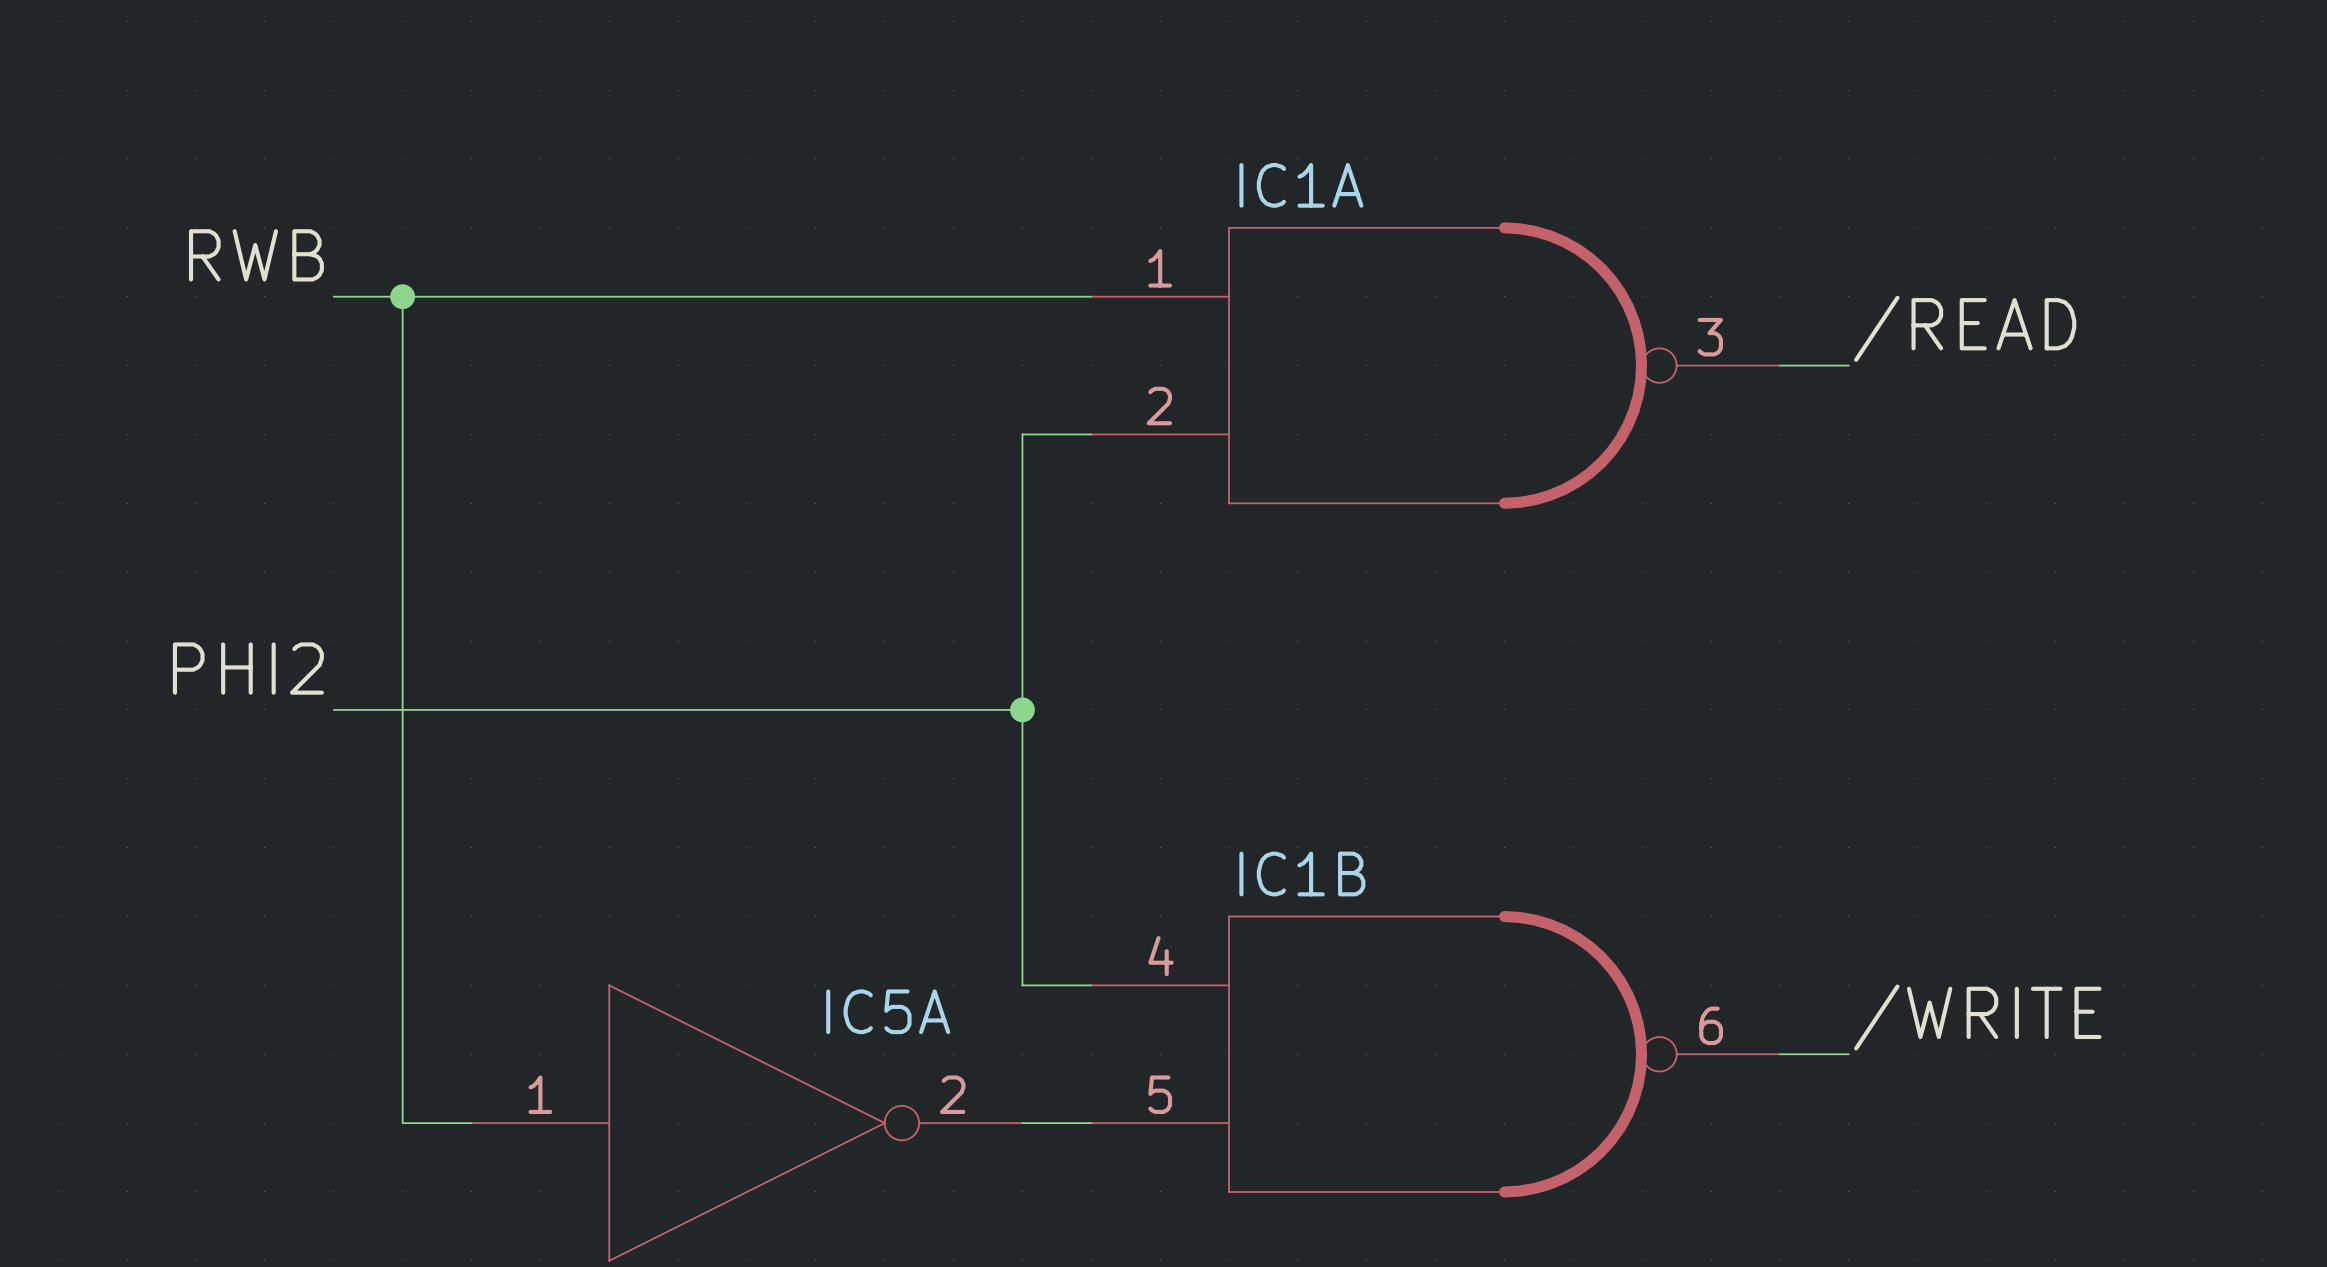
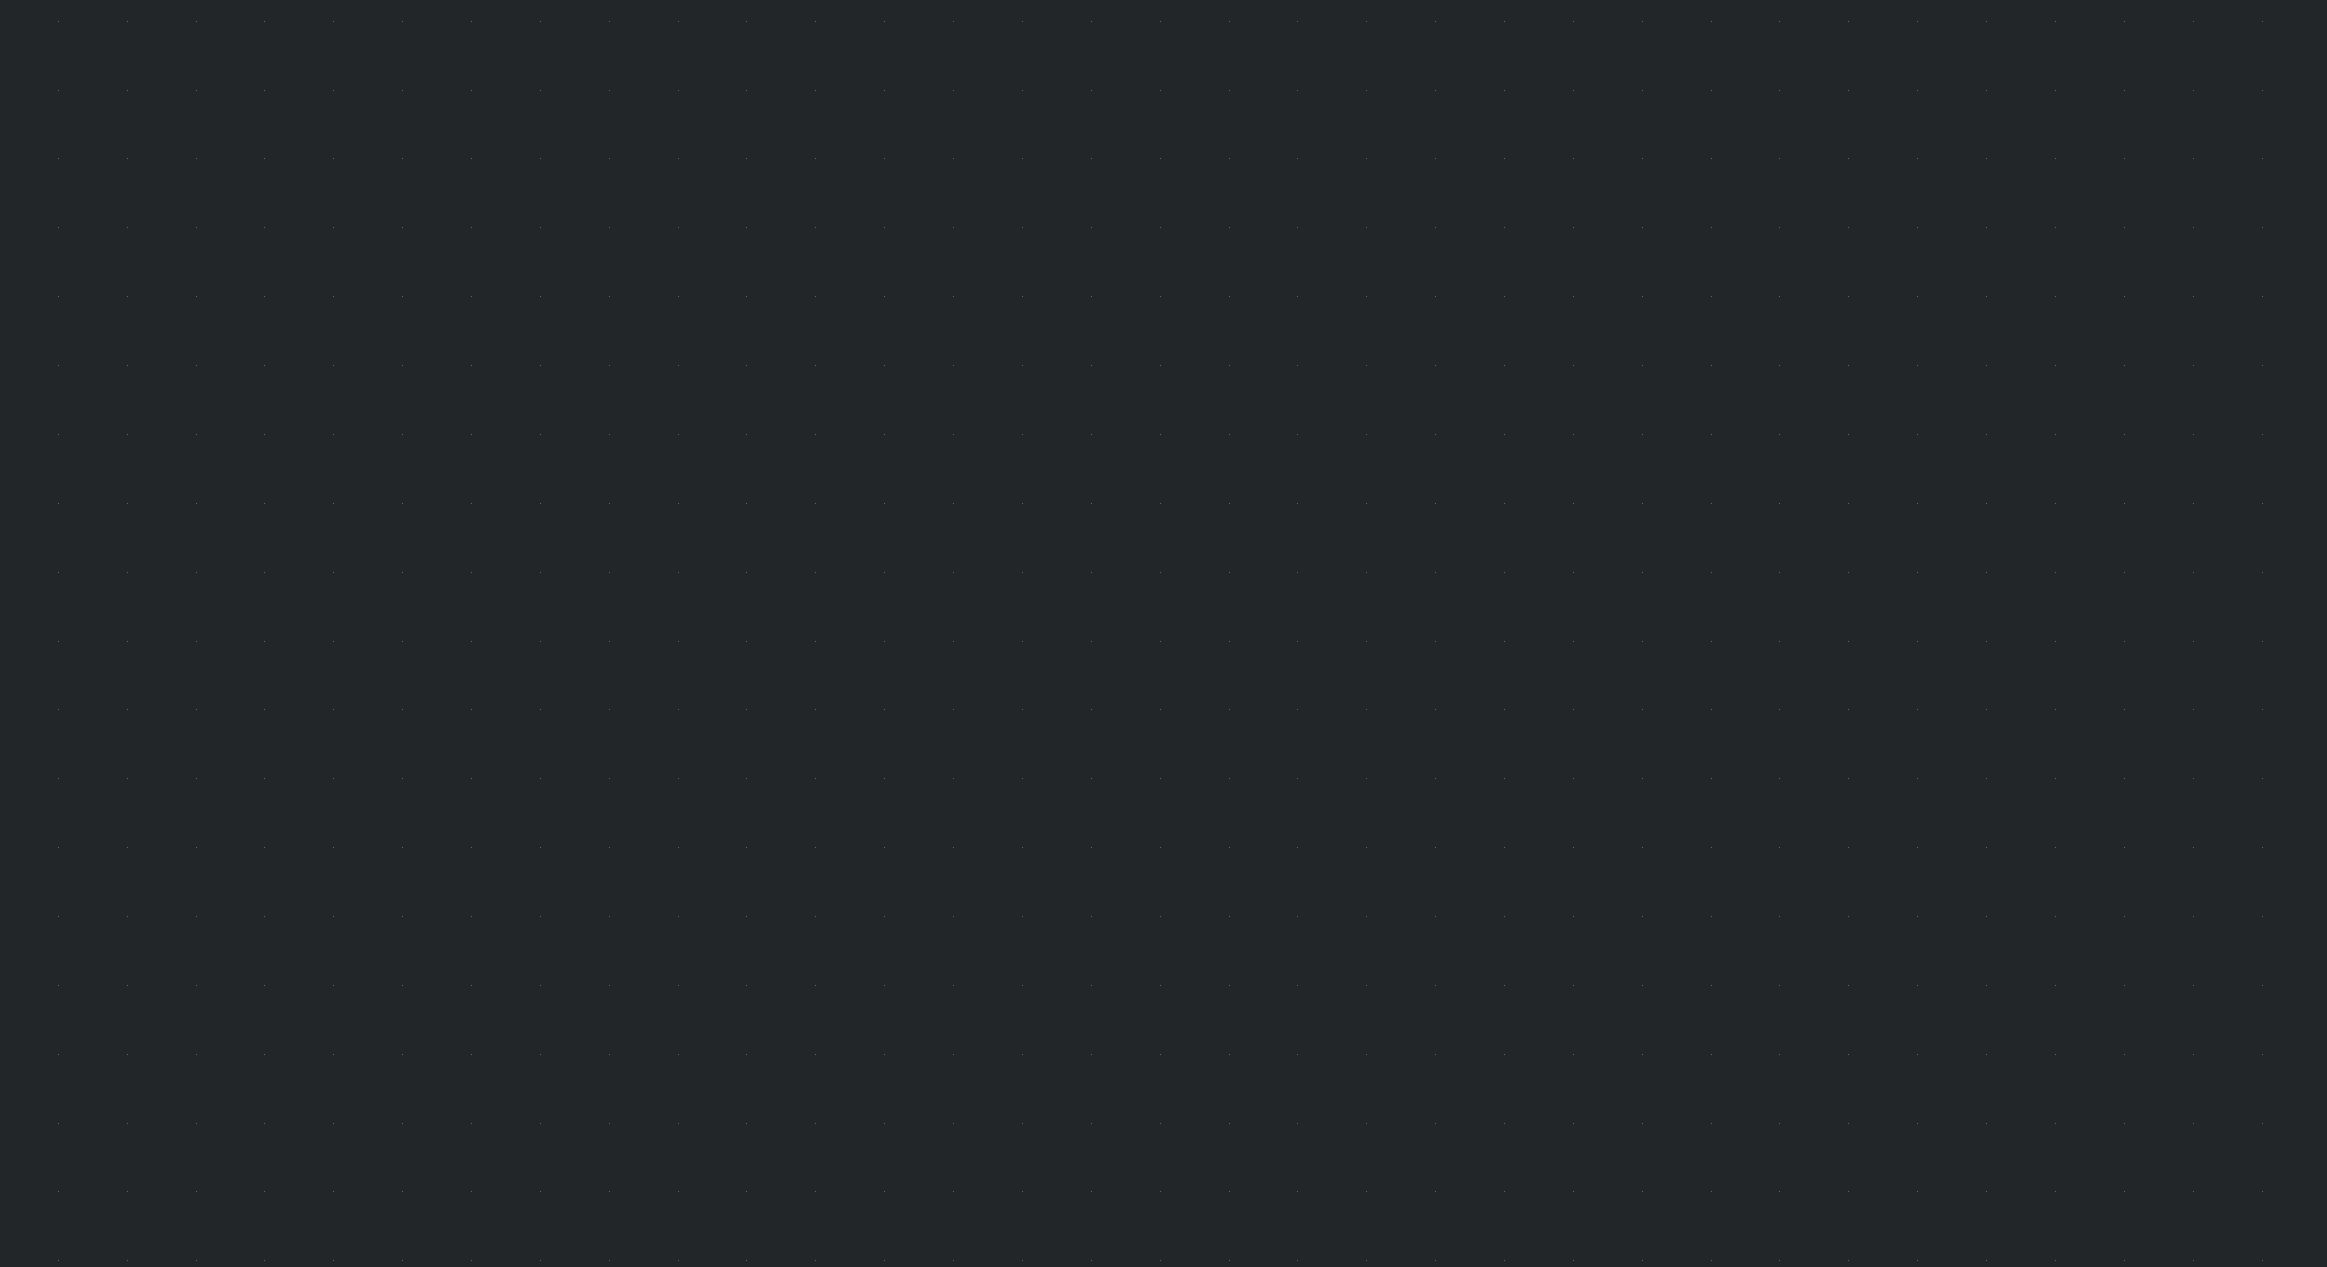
label: RWB (256, 255) -> none
wire: (333, 296) (1091, 296) -> none
wire: (402, 296) (402, 1123) (471, 1123) -> none
junction: (402, 296) -> none
label: /READ (1965, 328) -> none
IC1A: (1435, 365) -> none
wire: (1779, 365) (1848, 365) -> none
wire: (1091, 434) (1022, 434) (1022, 985) (1091, 985) -> none
label: PHI2 (248, 668) -> none
wire: (333, 709) (1022, 709) -> none
junction: (1022, 709) -> none
label: /WRITE (1977, 1017) -> none
IC1B: (1435, 1054) -> none
wire: (1779, 1054) (1848, 1054) -> none
IC5A: (746, 1123) -> none
wire: (1022, 1123) (1091, 1123) -> none

